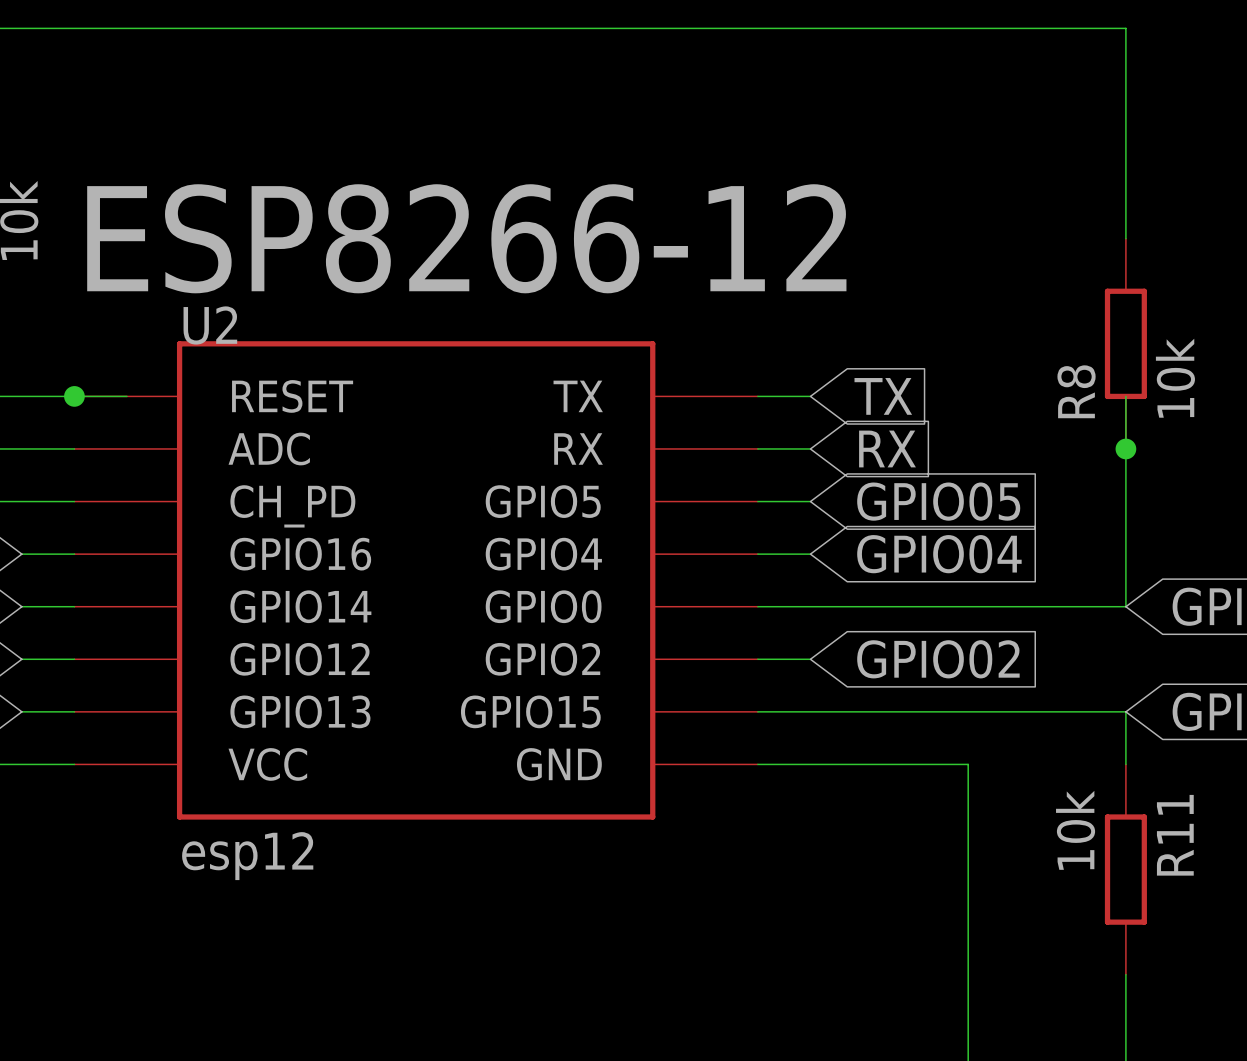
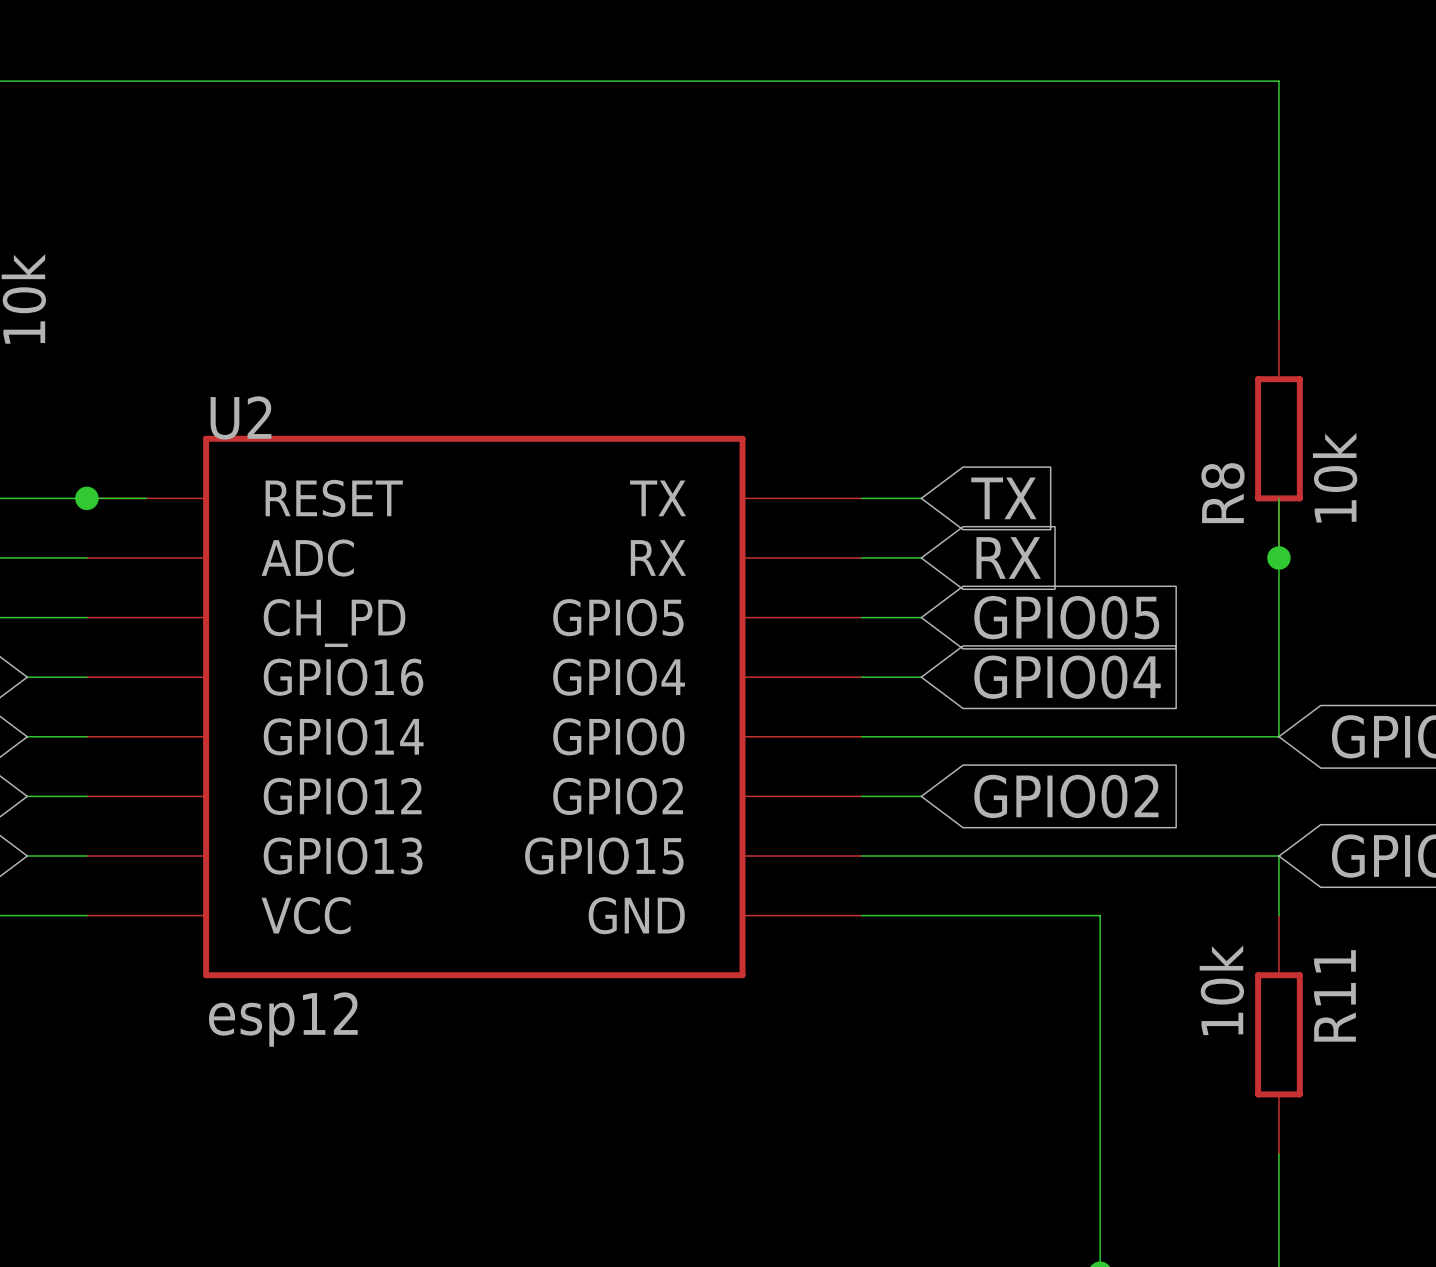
text: ESP8266-12 (466, 238) -> none

